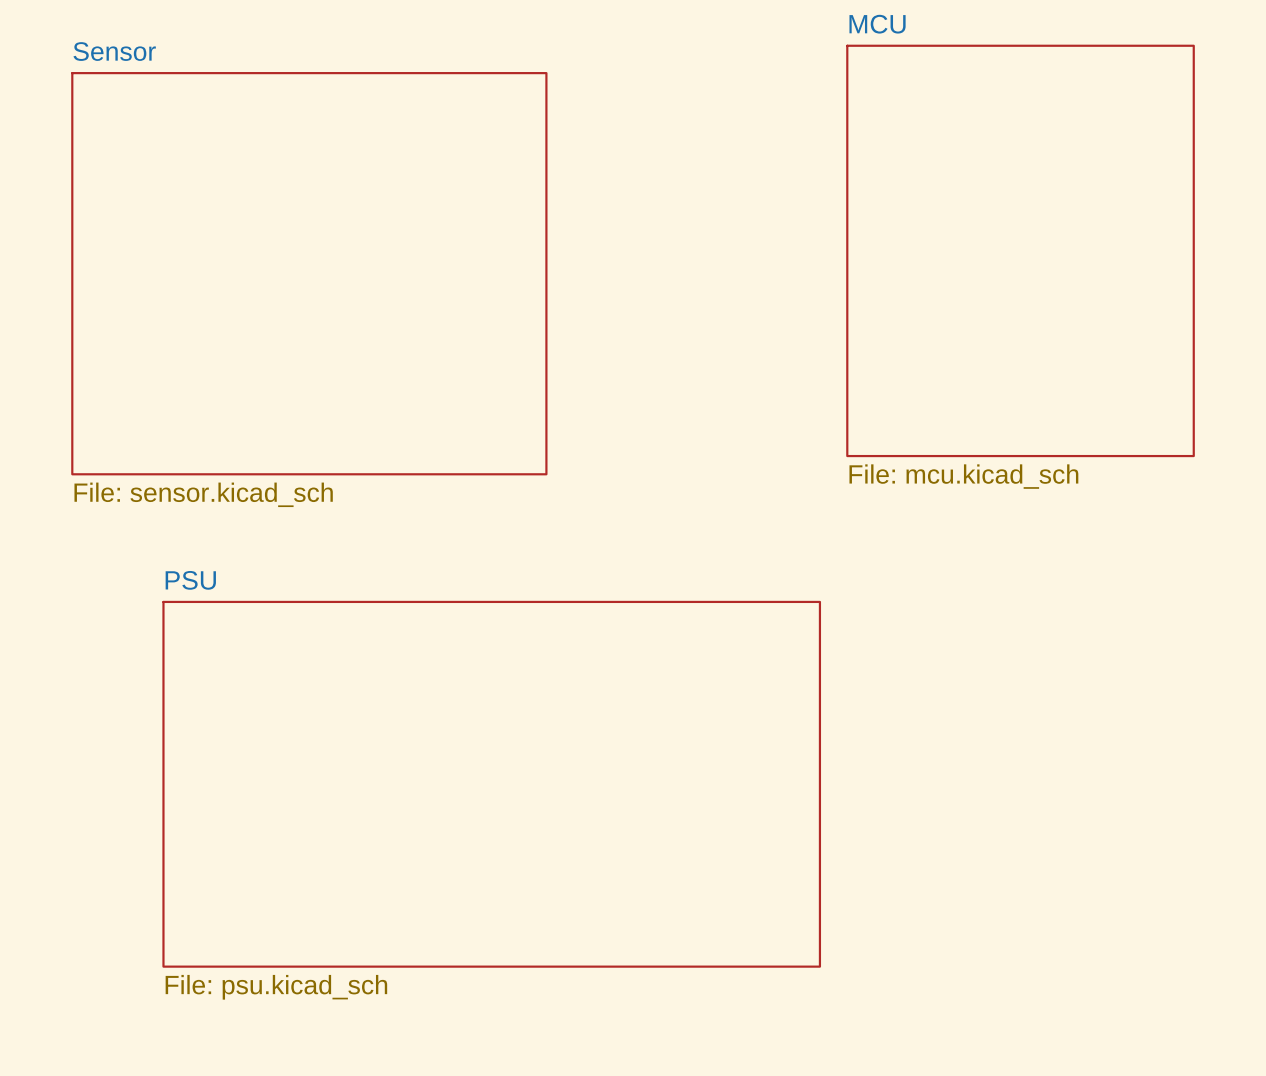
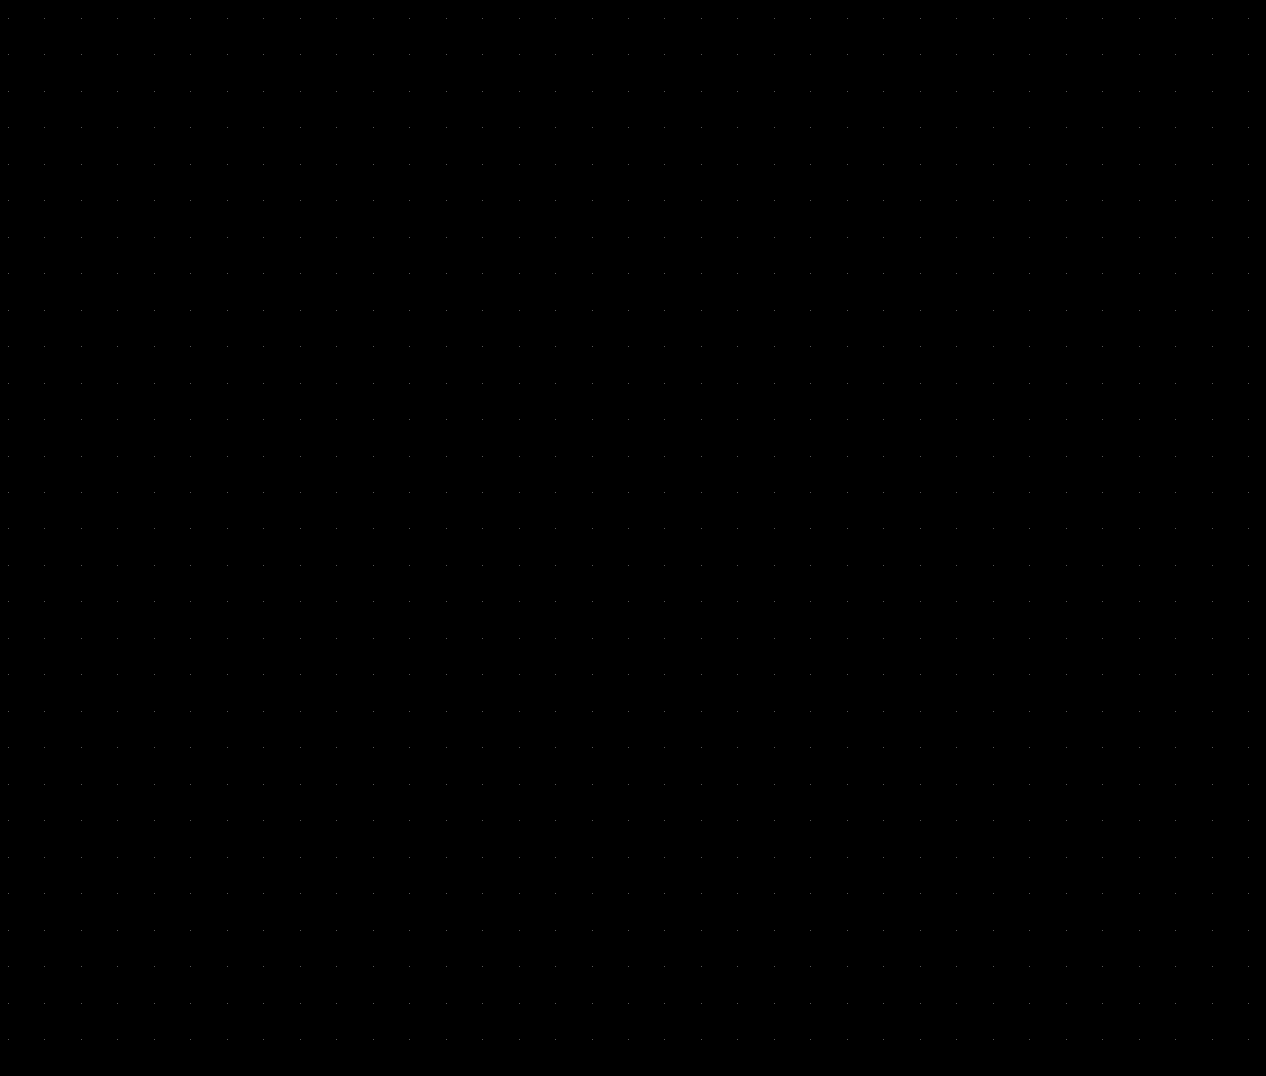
sheet MCU: File: mcu.kicad_sch (1020, 250) -> none
sheet Sensor: File: sensor.kicad_sch (309, 273) -> none
sheet PSU: File: psu.kicad_sch (491, 784) -> none

